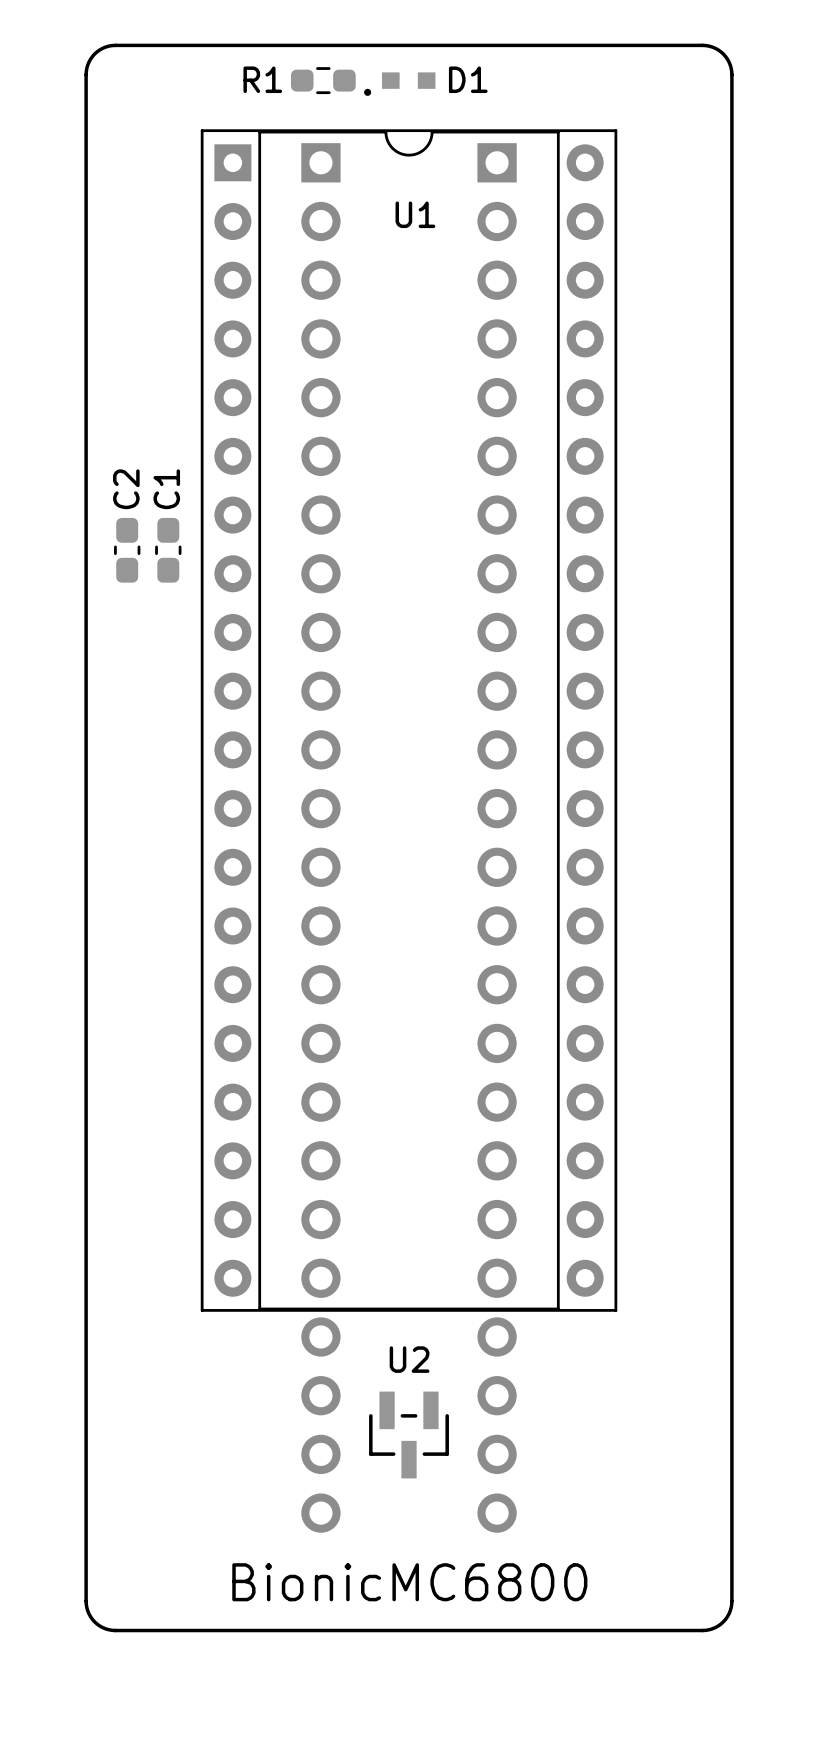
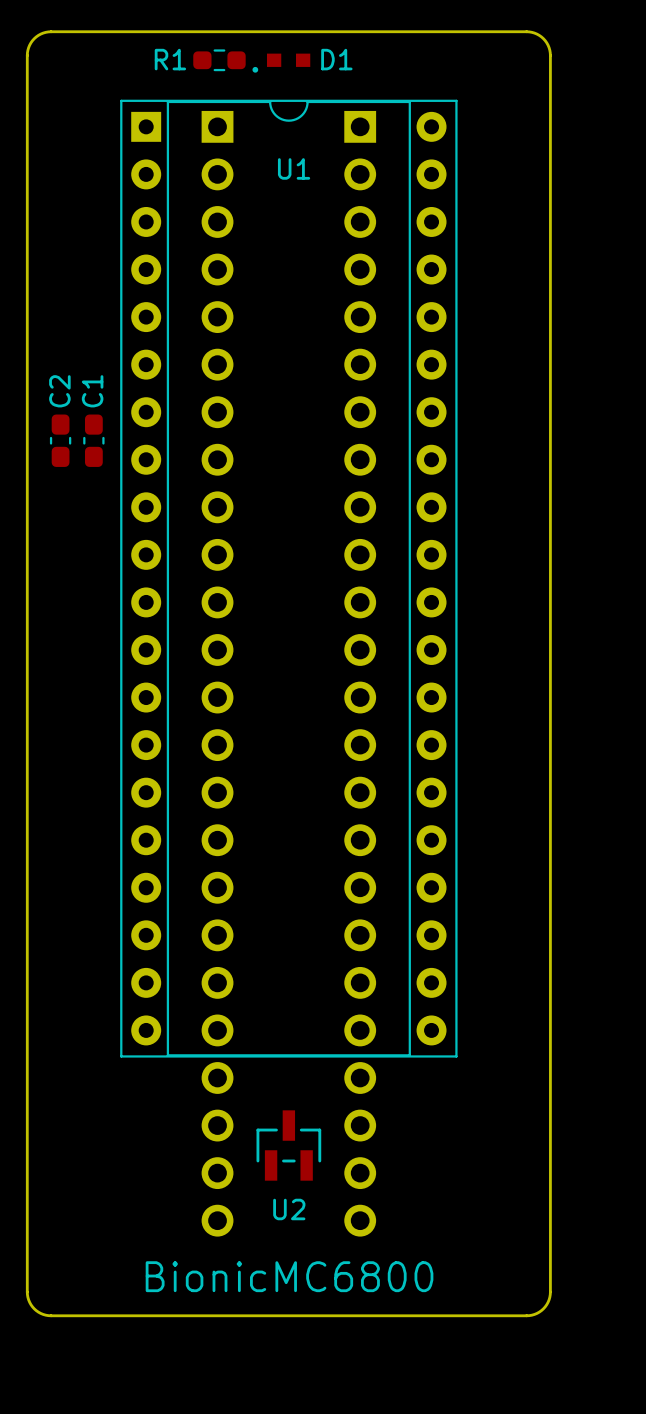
U2 rotation: 0° (409, 1435) -> 180° (288, 1145)

